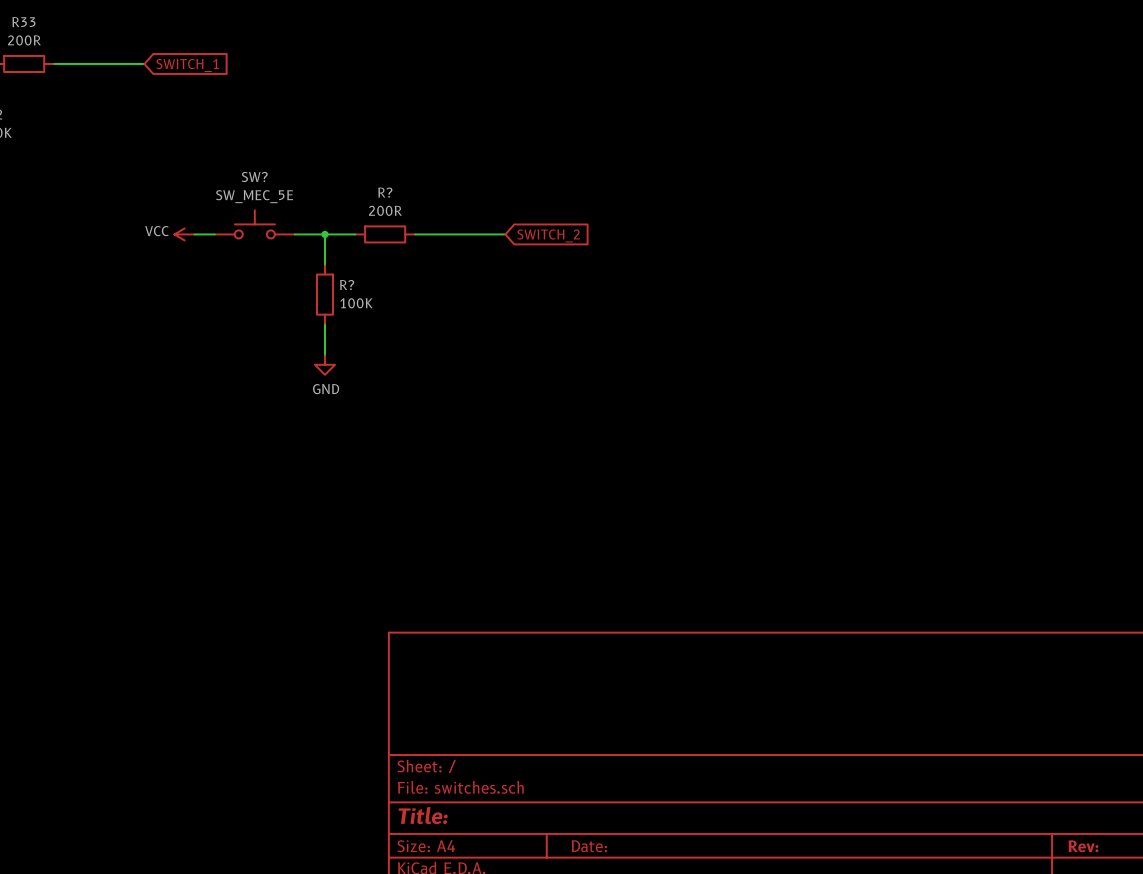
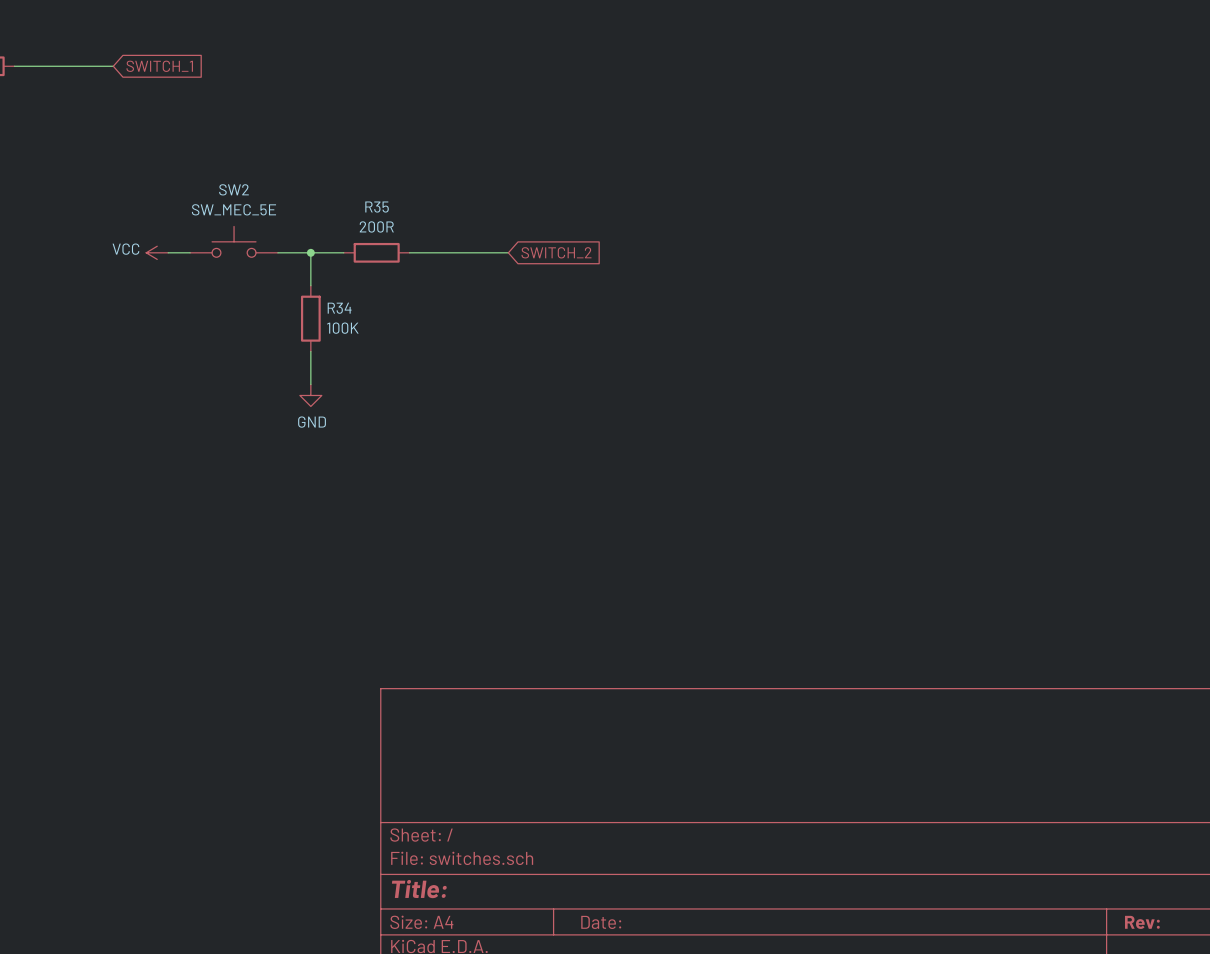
SW? name: SW? (254, 176) -> SW2 (233, 189)
R? name: R? (385, 192) -> R35 (377, 207)
R? name: R? (347, 285) -> R34 (339, 308)

